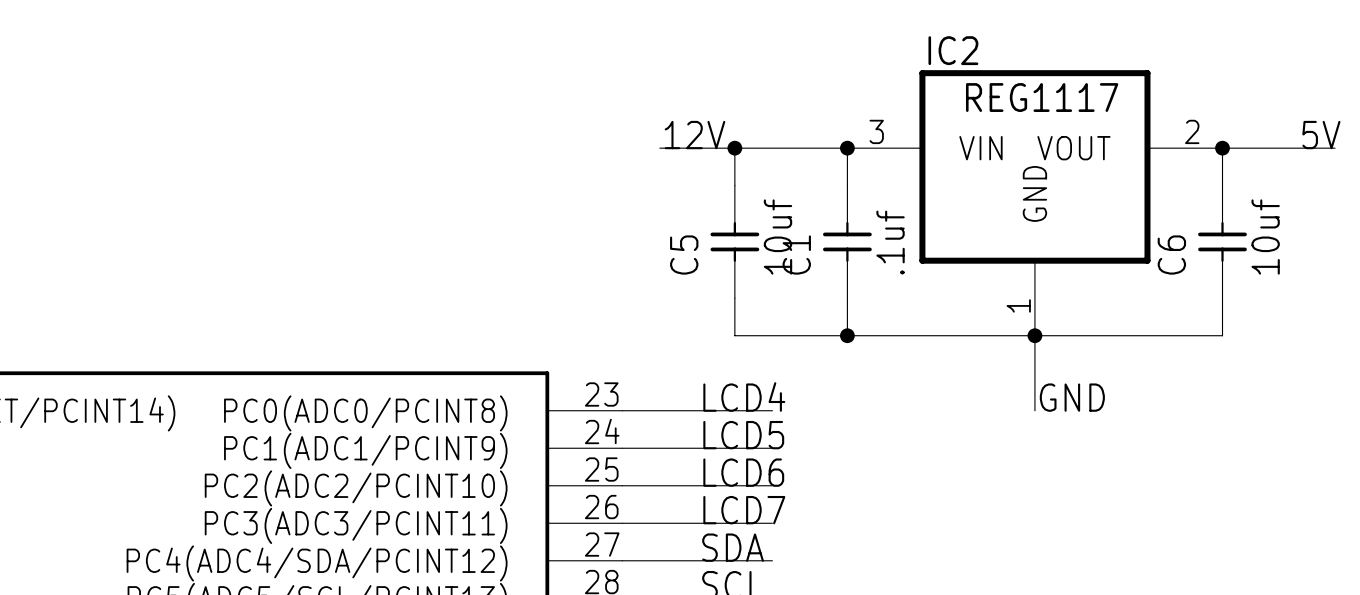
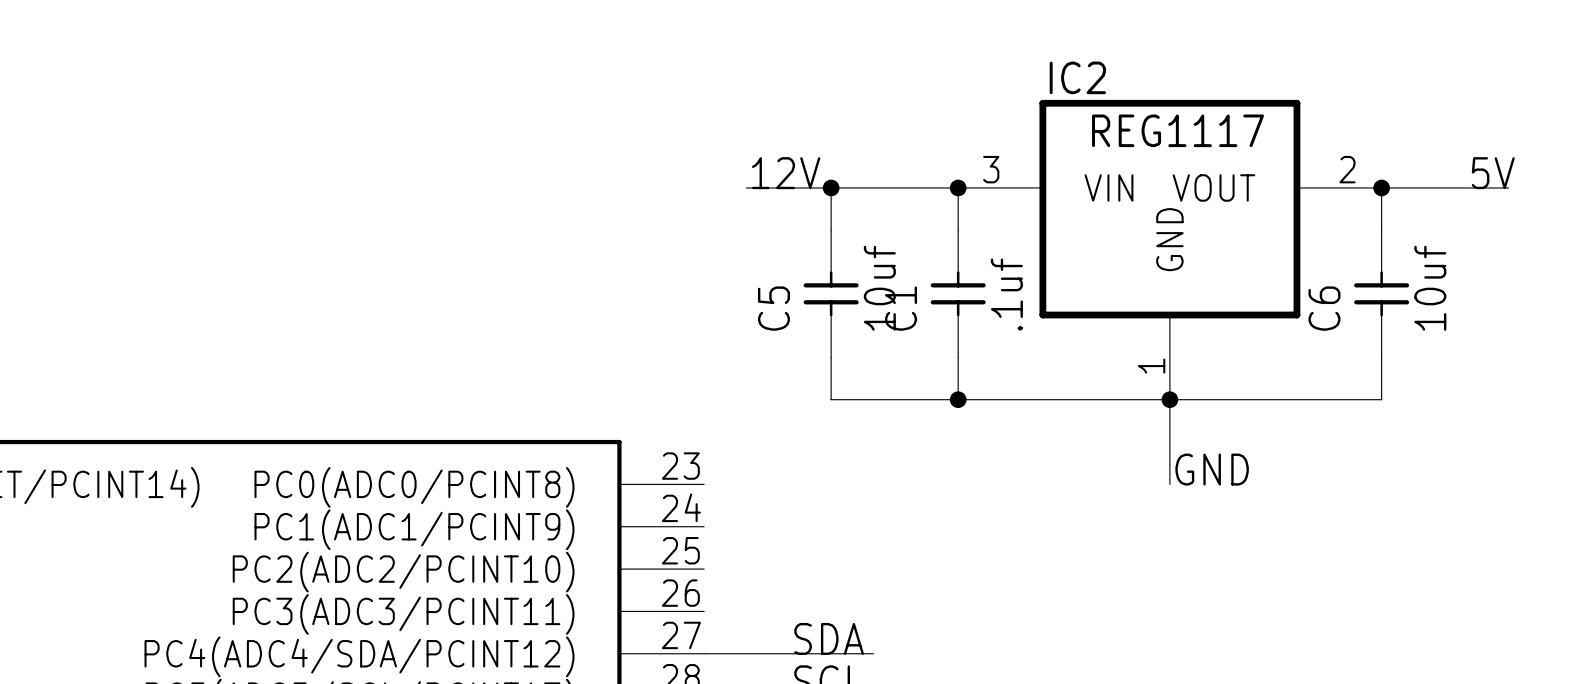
label: LCD4 (744, 396) -> none
wire: (622, 410) (772, 410) -> none
label: LCD5 (743, 435) -> none
wire: (622, 448) (772, 448) -> none
label: LCD6 (743, 472) -> none
wire: (622, 485) (772, 485) -> none
label: LCD7 (744, 510) -> none
wire: (622, 523) (772, 523) -> none

